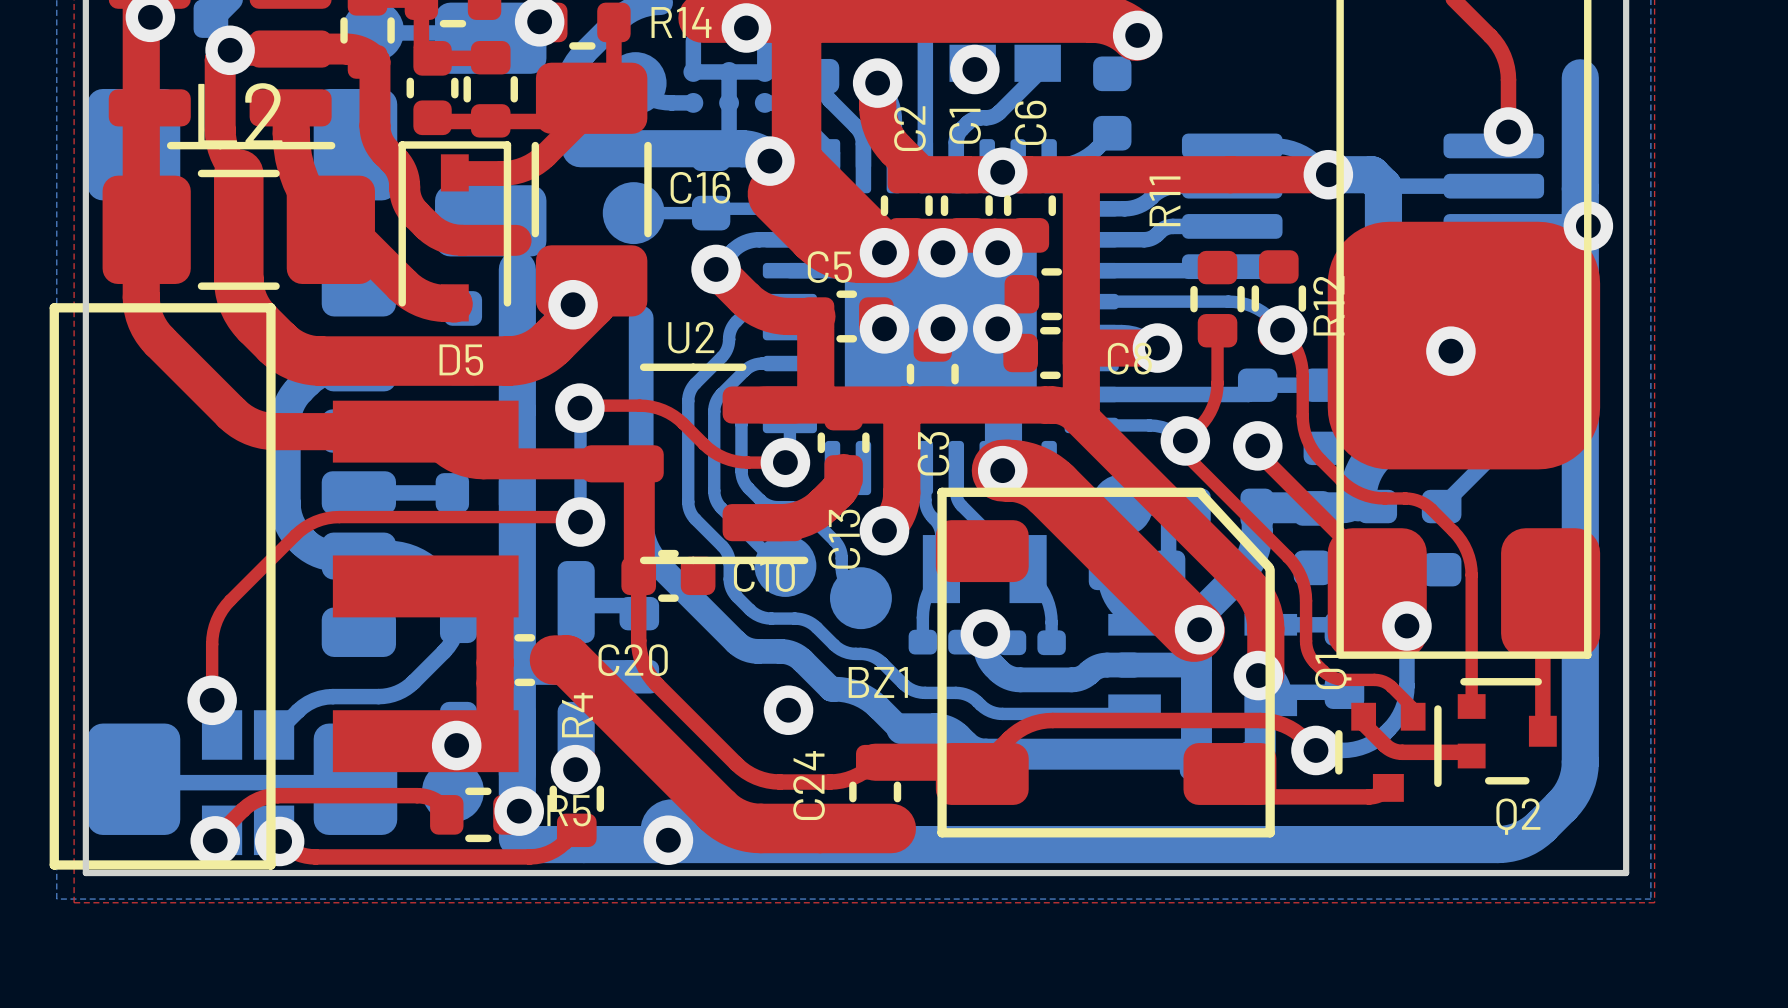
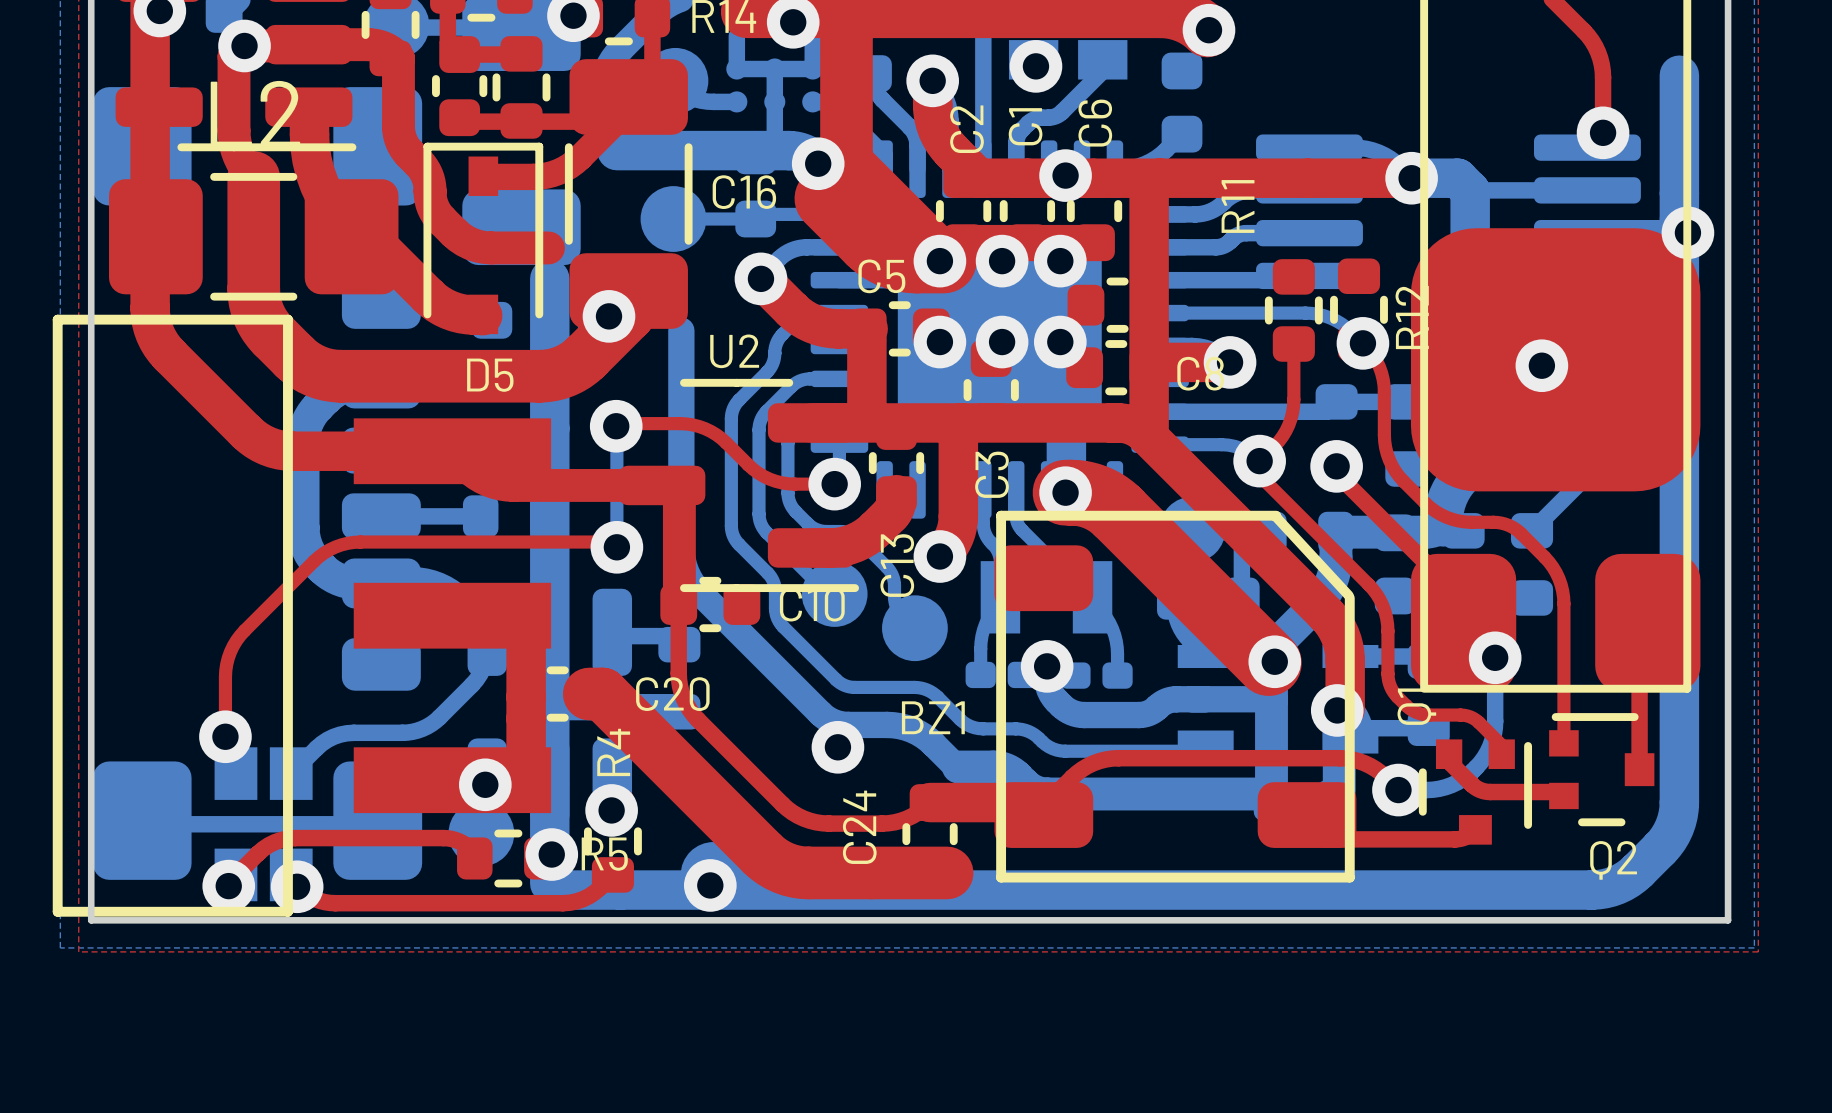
bottom track: (749, 609) (763, 617) (797, 618) (806, 620) (814, 625) (836, 647) (847, 652) (855, 653) -> (796, 640) (836, 679) (844, 685) (854, 687) (909, 687)
bottom track: (736, 642) (749, 650) (783, 651) (795, 655) (831, 689) -> (782, 675) (829, 720) (844, 724) (883, 724)

